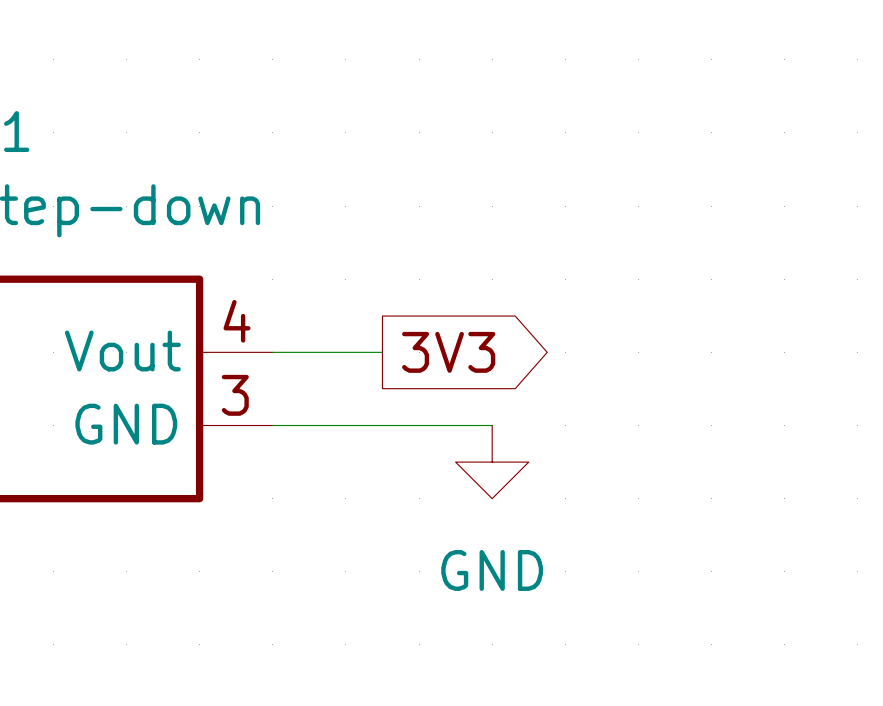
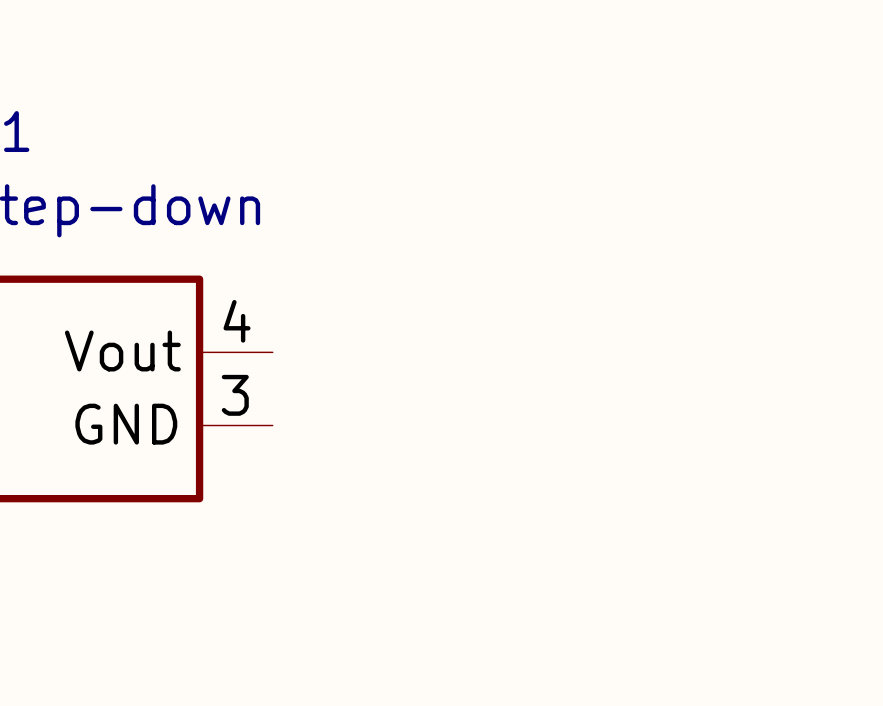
wire: (272, 352) (382, 352) -> none
global label: 3V3 (448, 352) -> none
wire: (272, 425) (492, 425) -> none
power symbol: GND (492, 462) -> none

